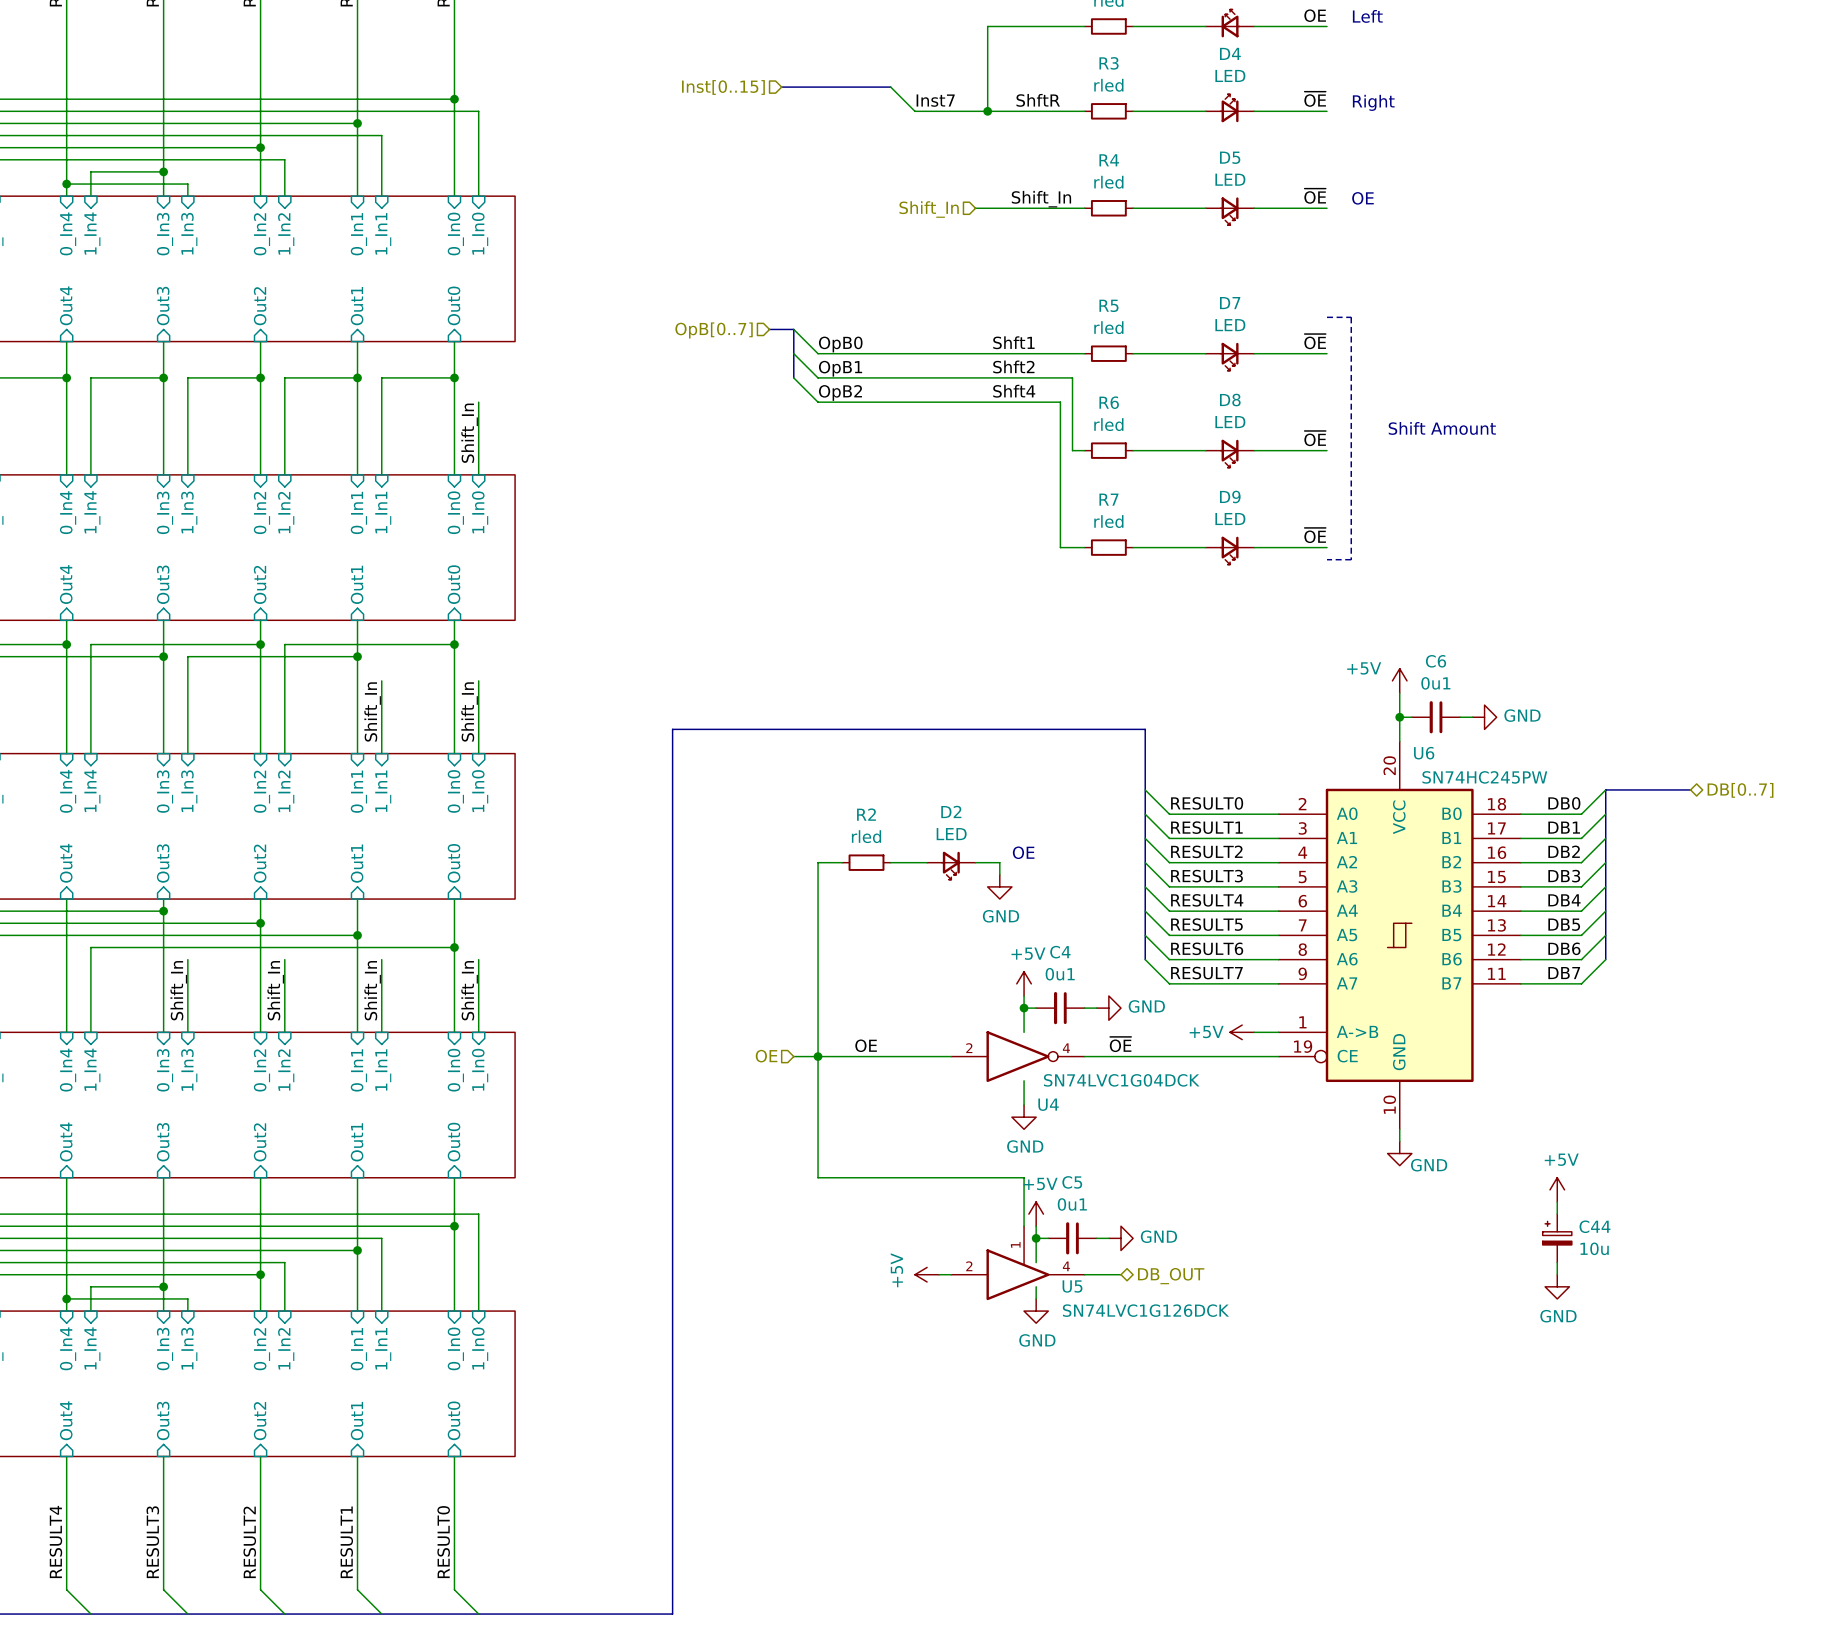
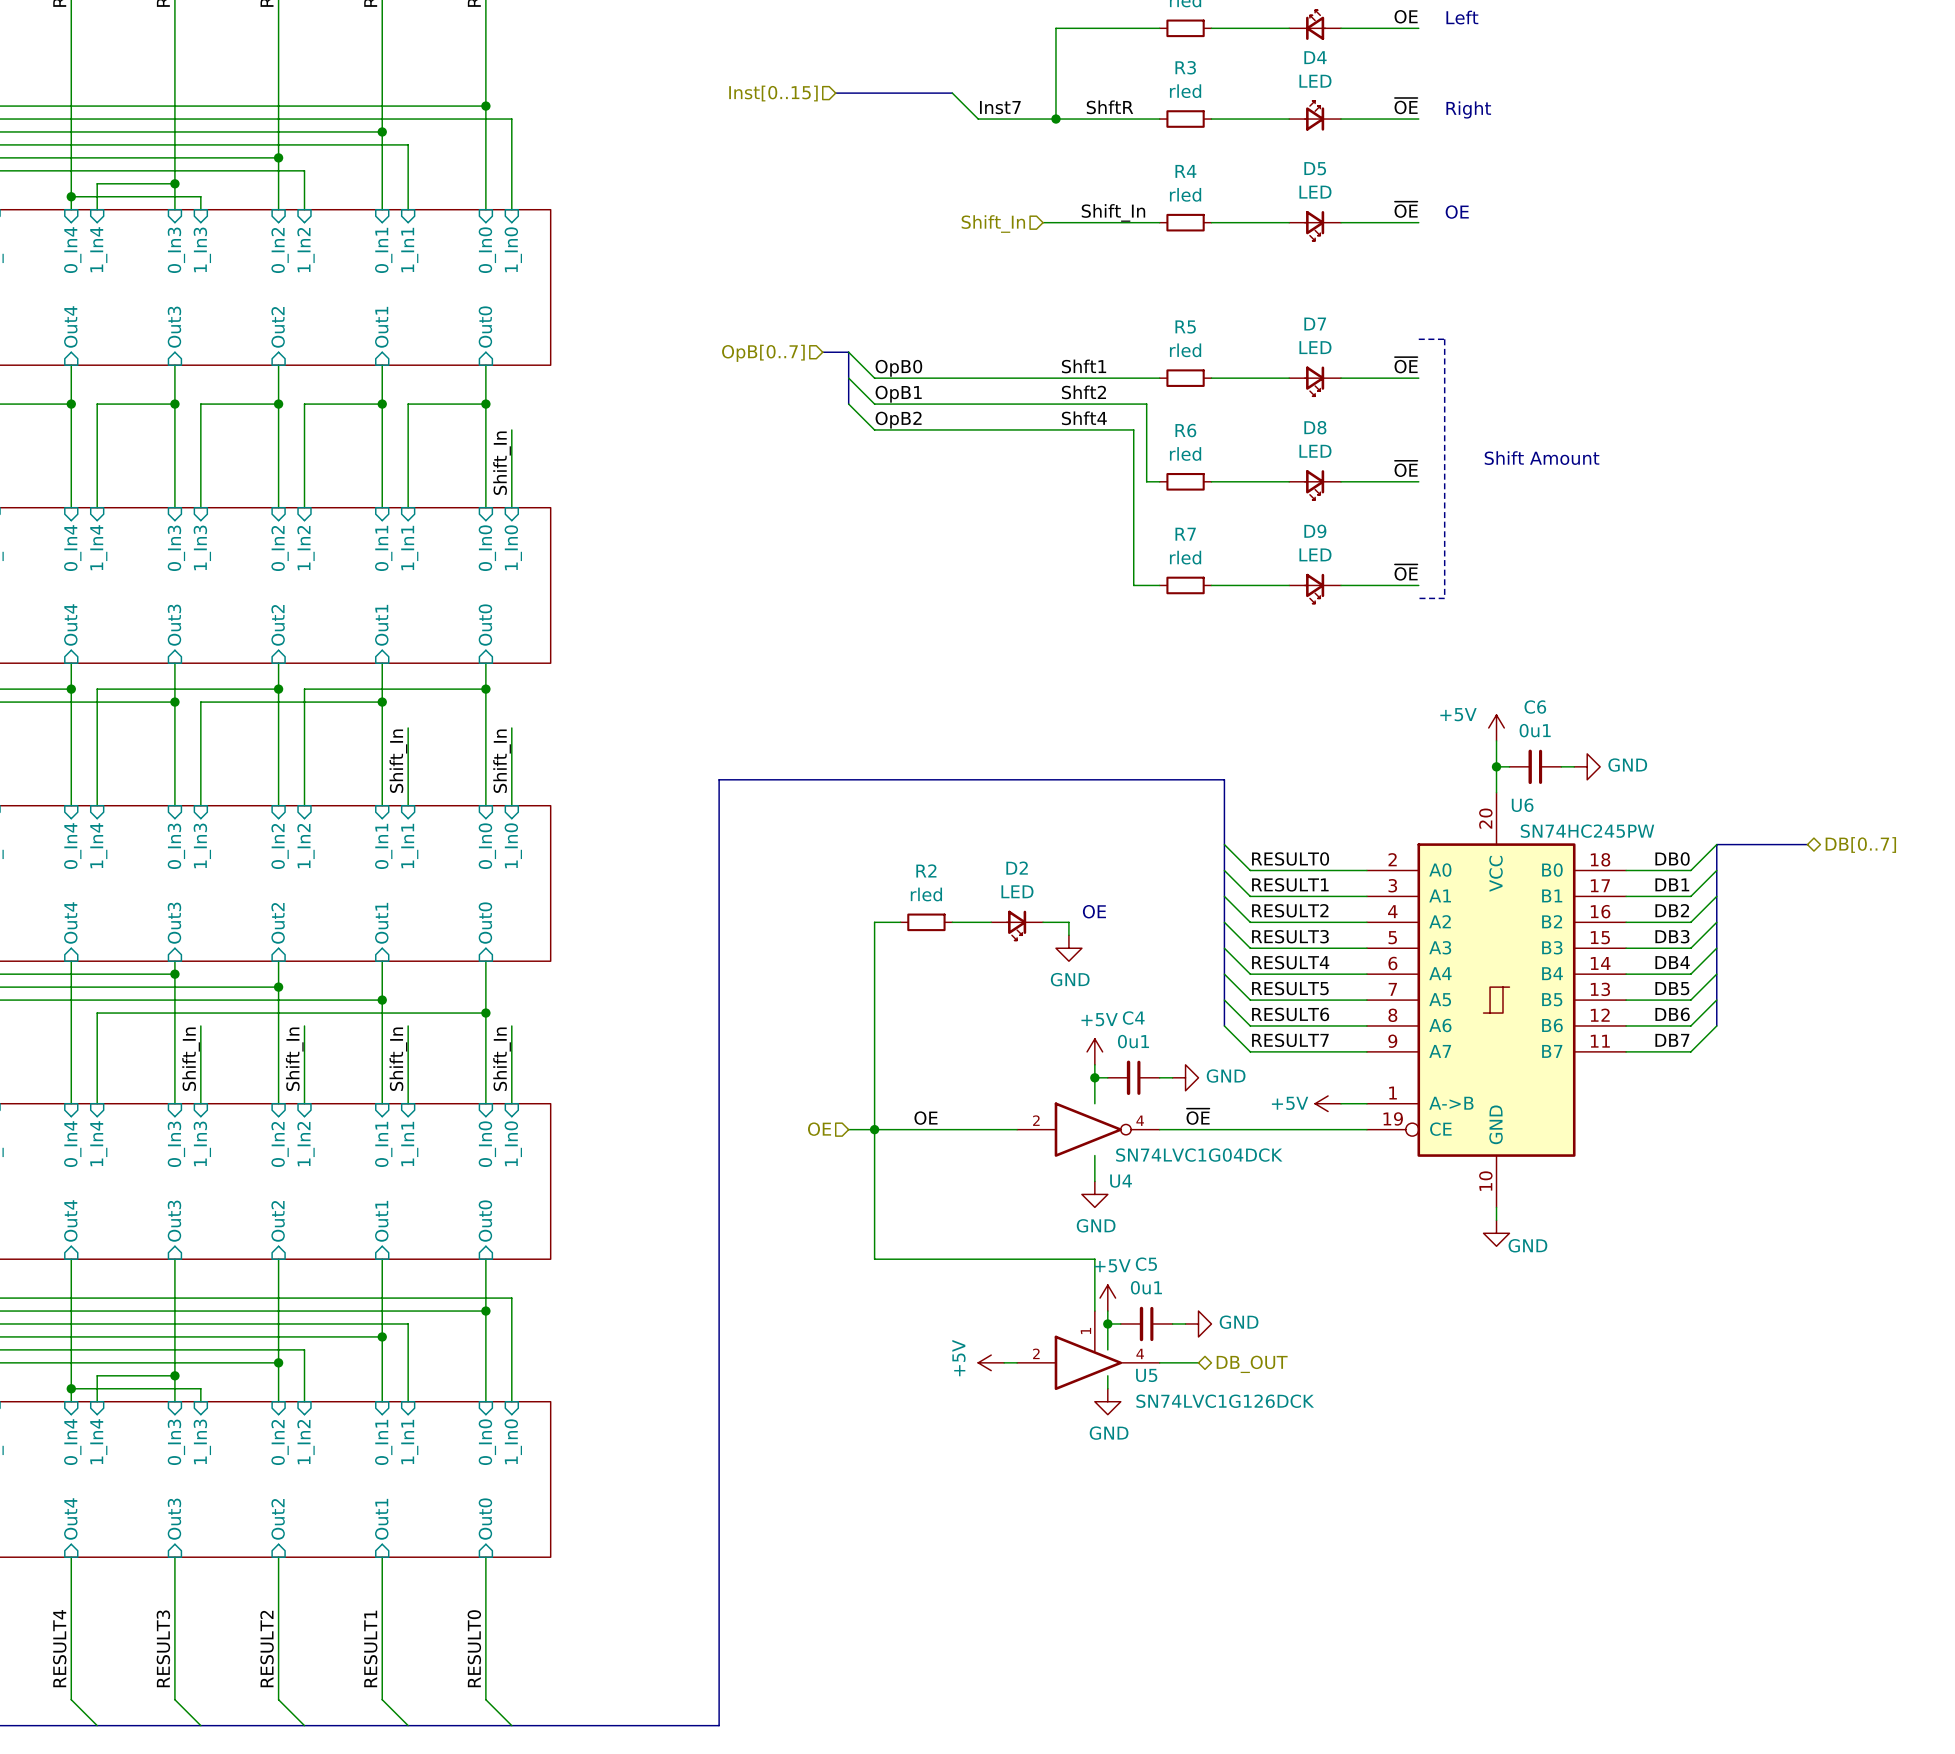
power symbol: +5V (1557, 1189) -> none
wire: (1557, 1202) (1557, 1214) -> none
C44: 10u (1557, 1238) -> none
wire: (1557, 1262) (1557, 1274) -> none
power symbol: GND (1557, 1286) -> none

